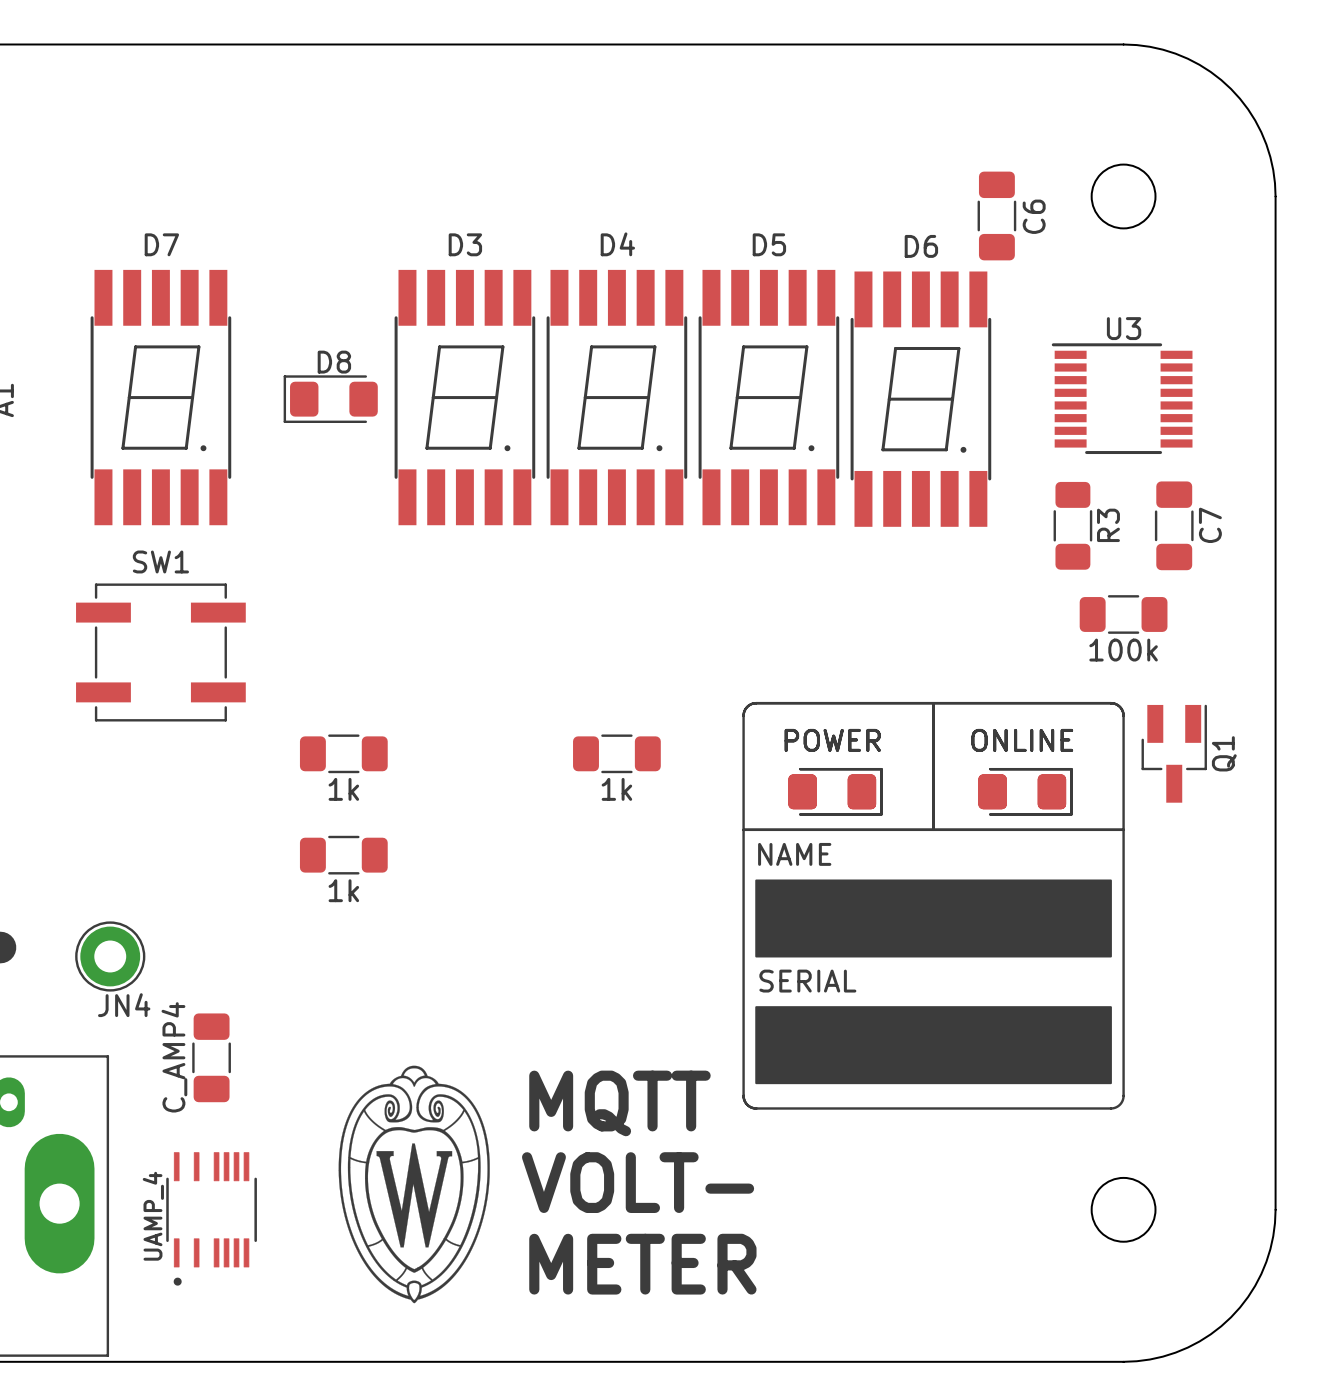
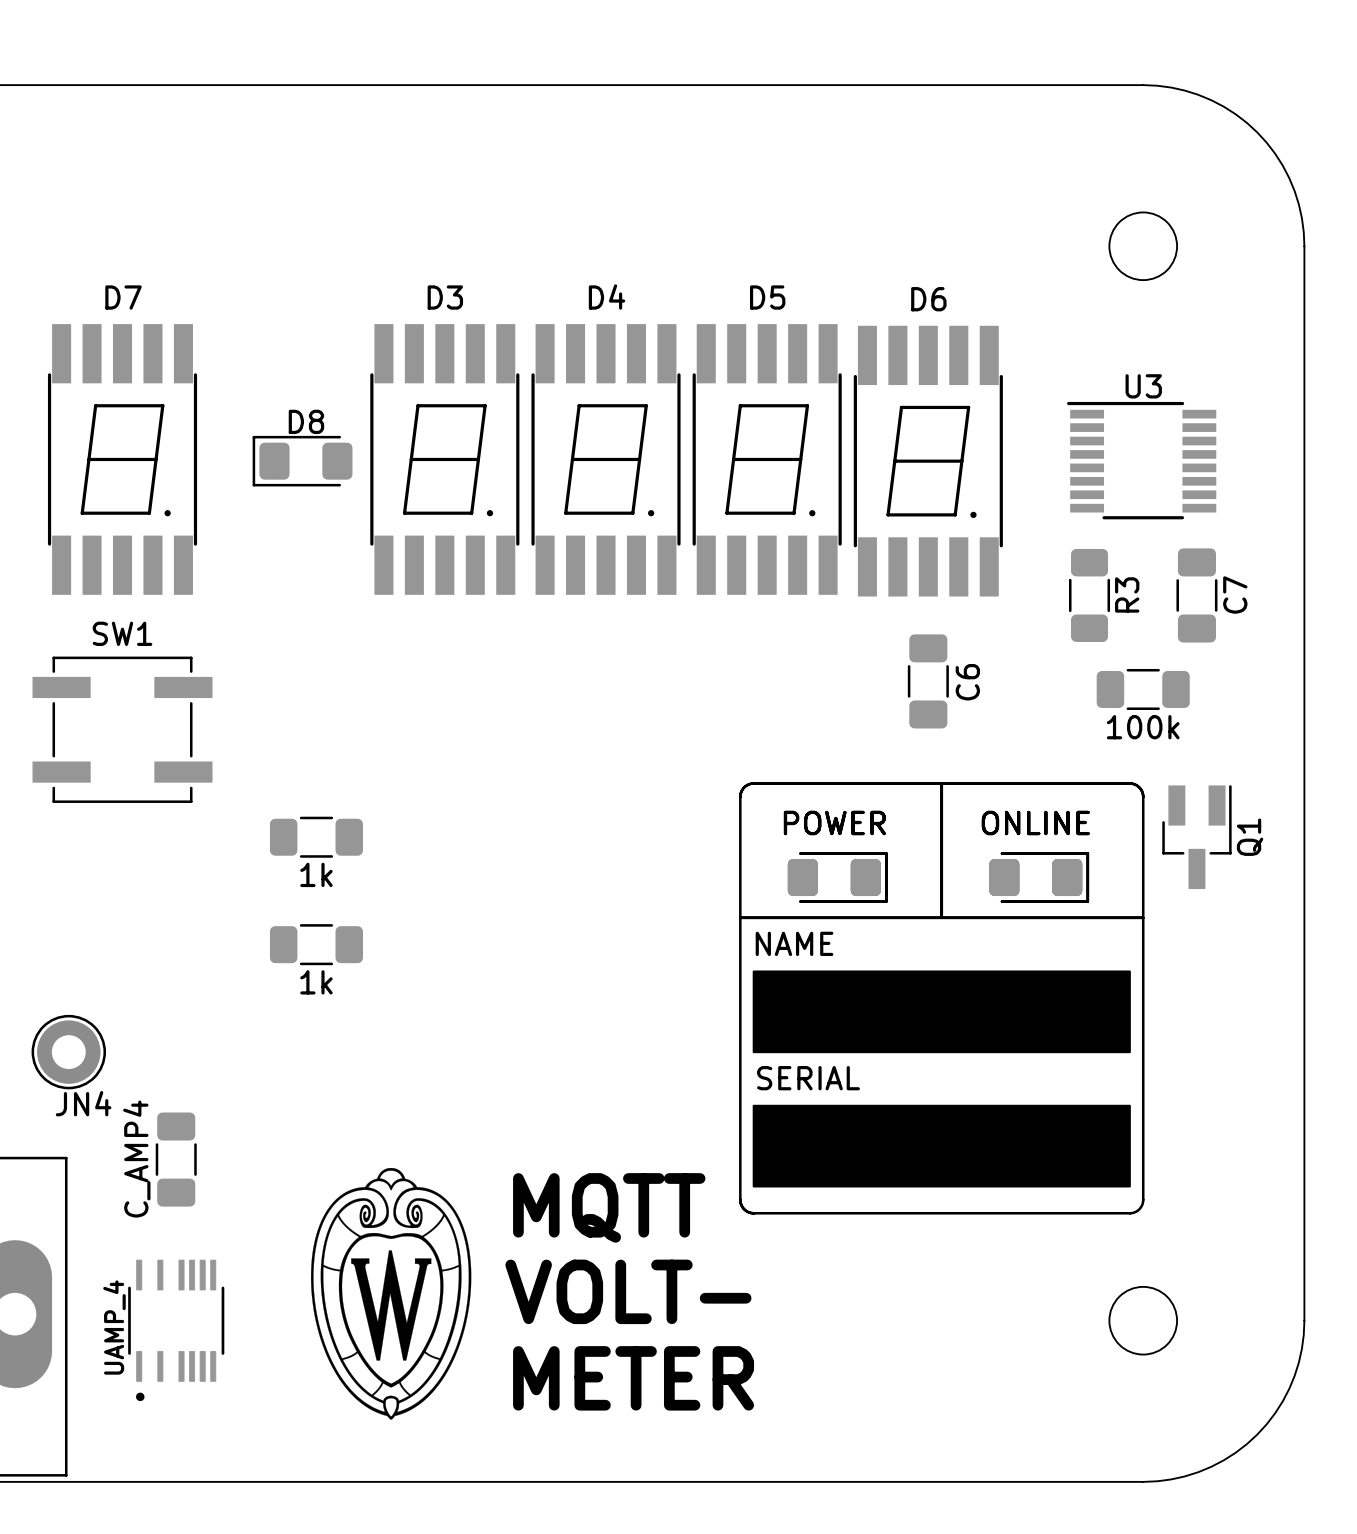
C6 position: (996, 215) -> (928, 681)
part: 1k (616, 753) -> none

